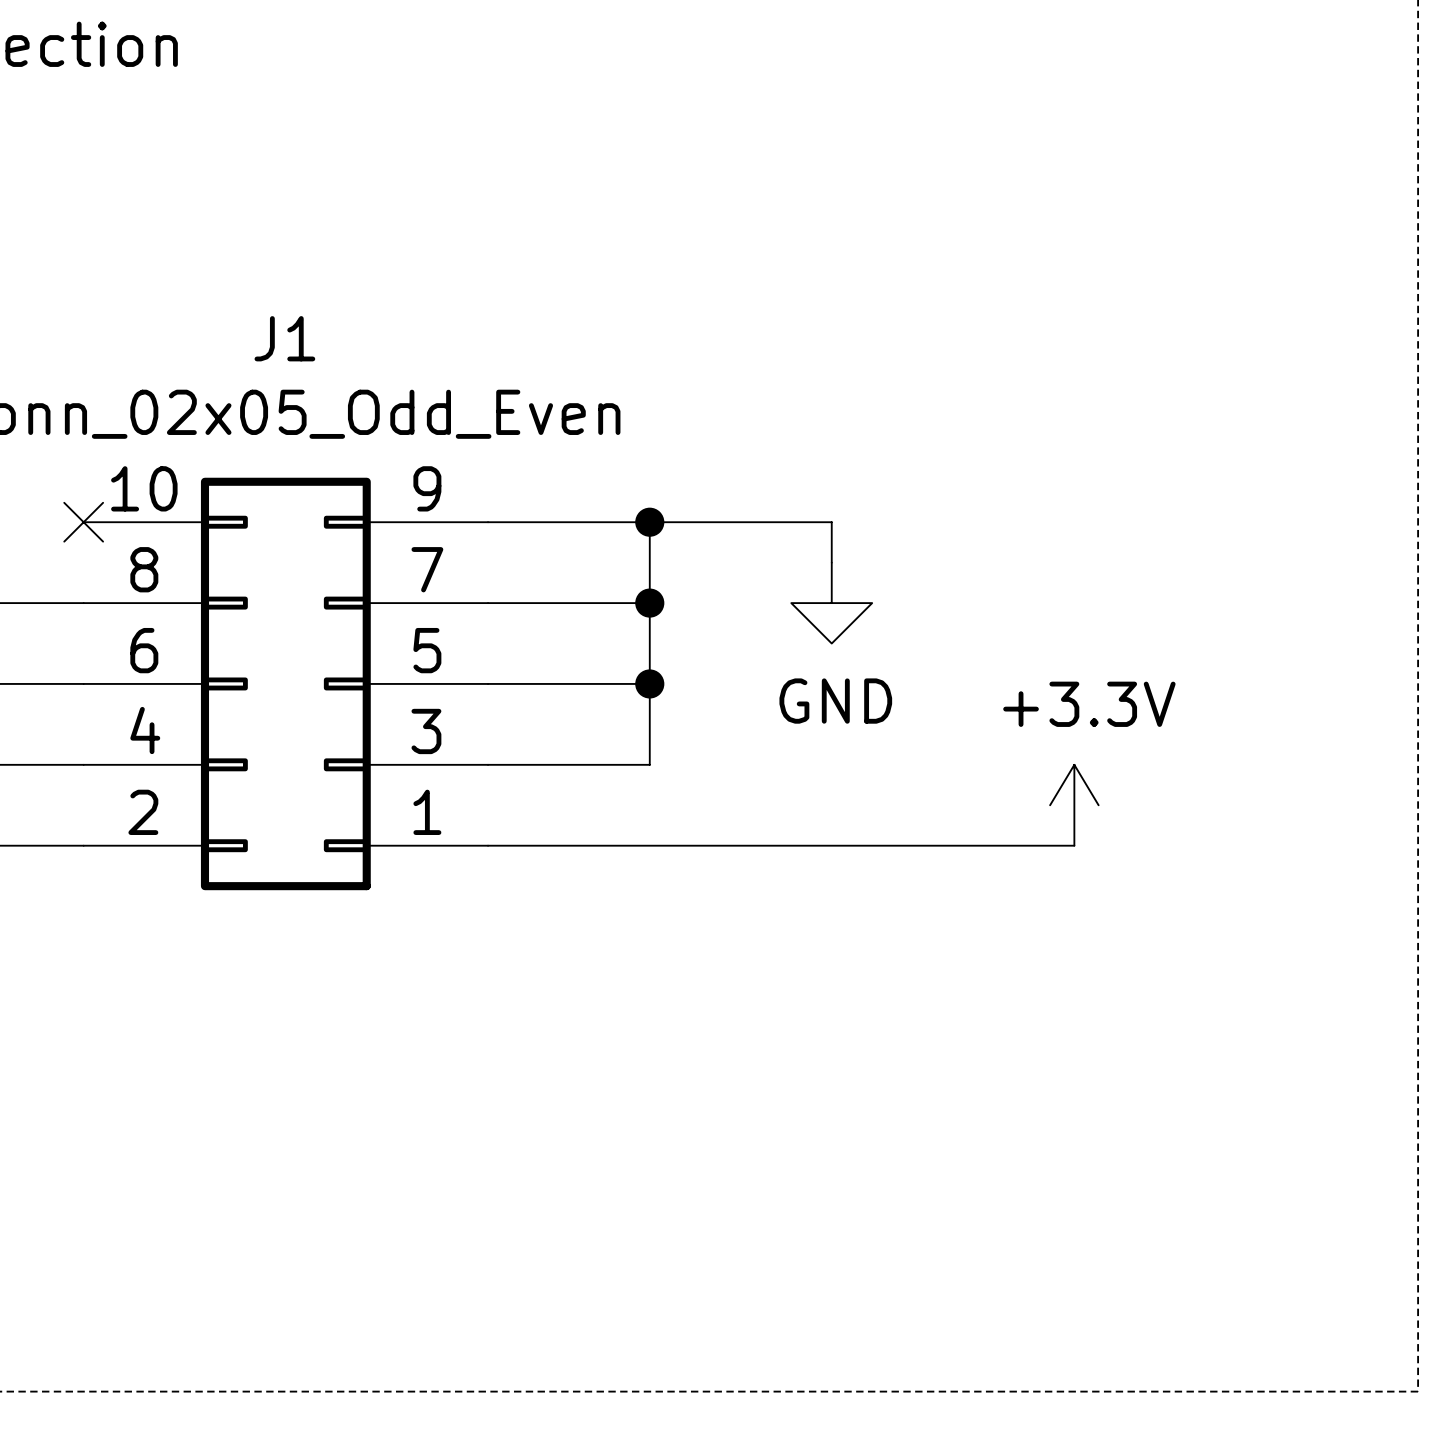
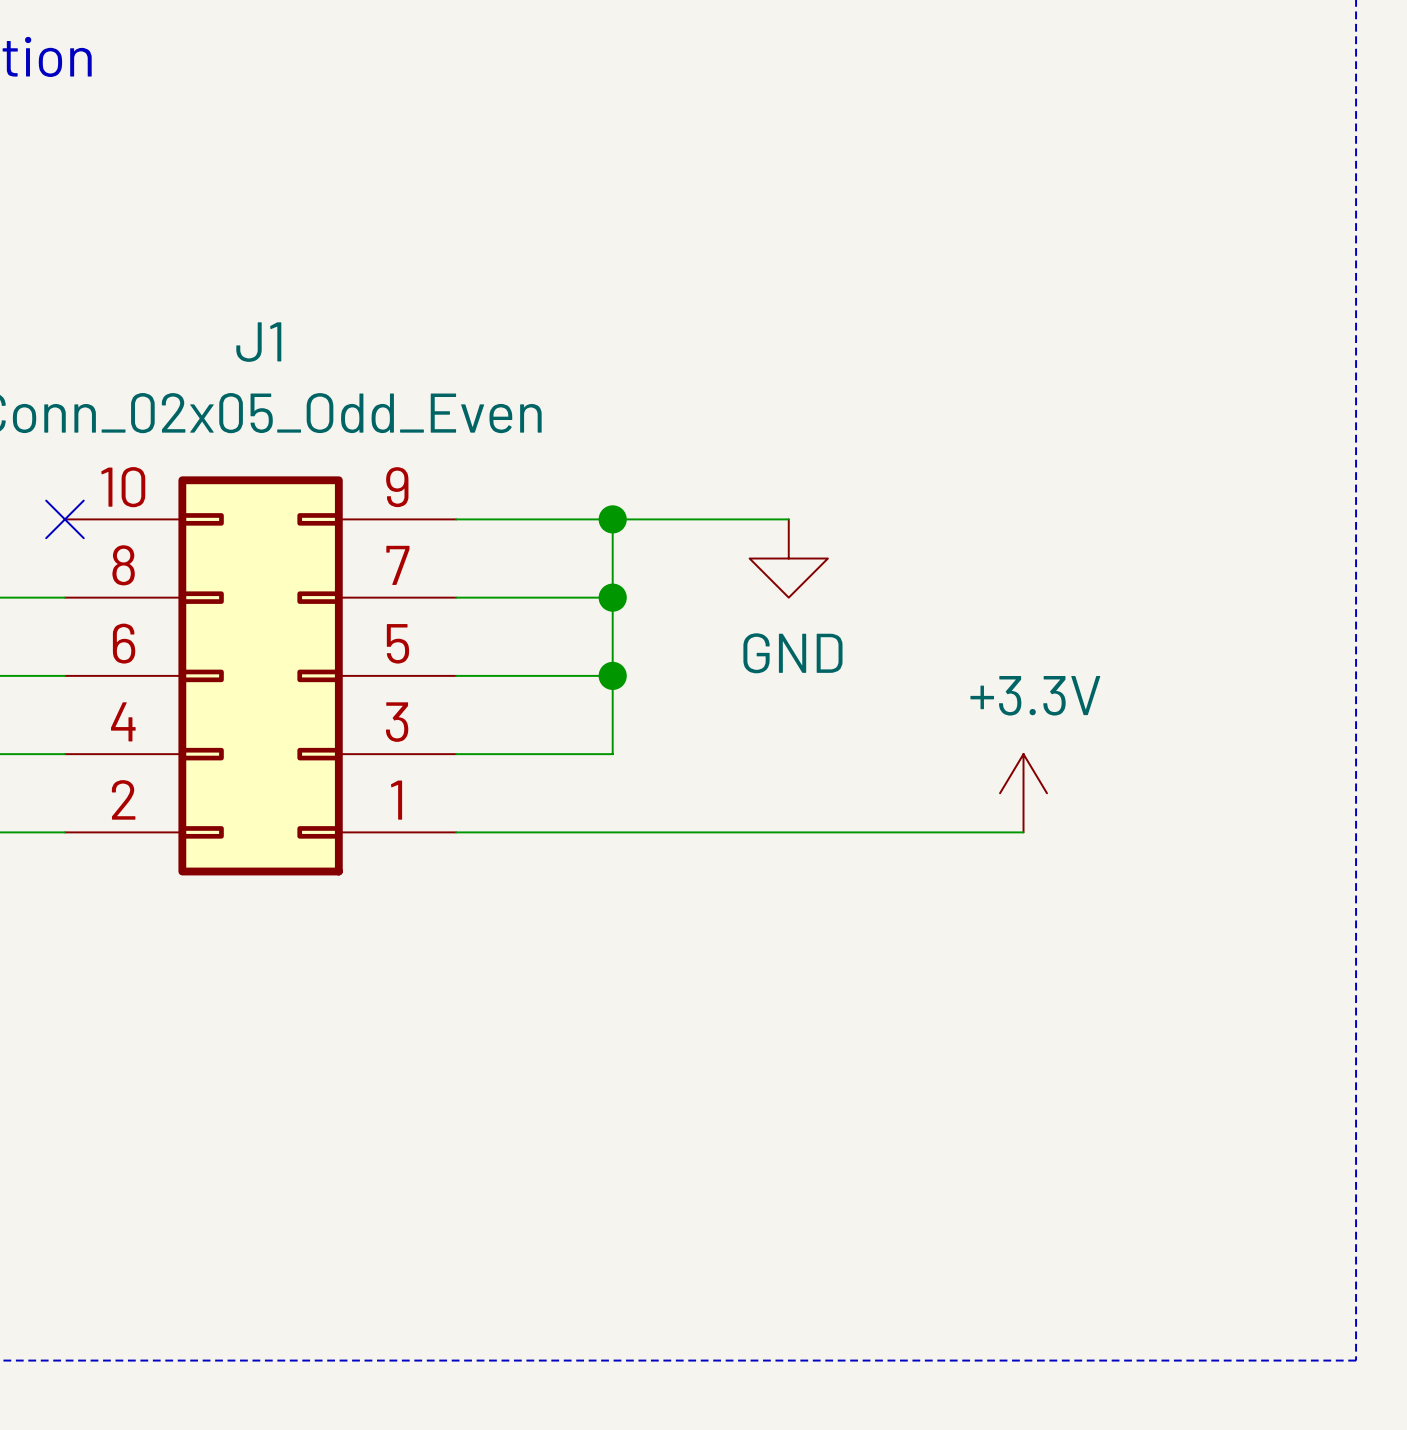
power symbol position: GND (831, 603) -> GND (788, 558)

